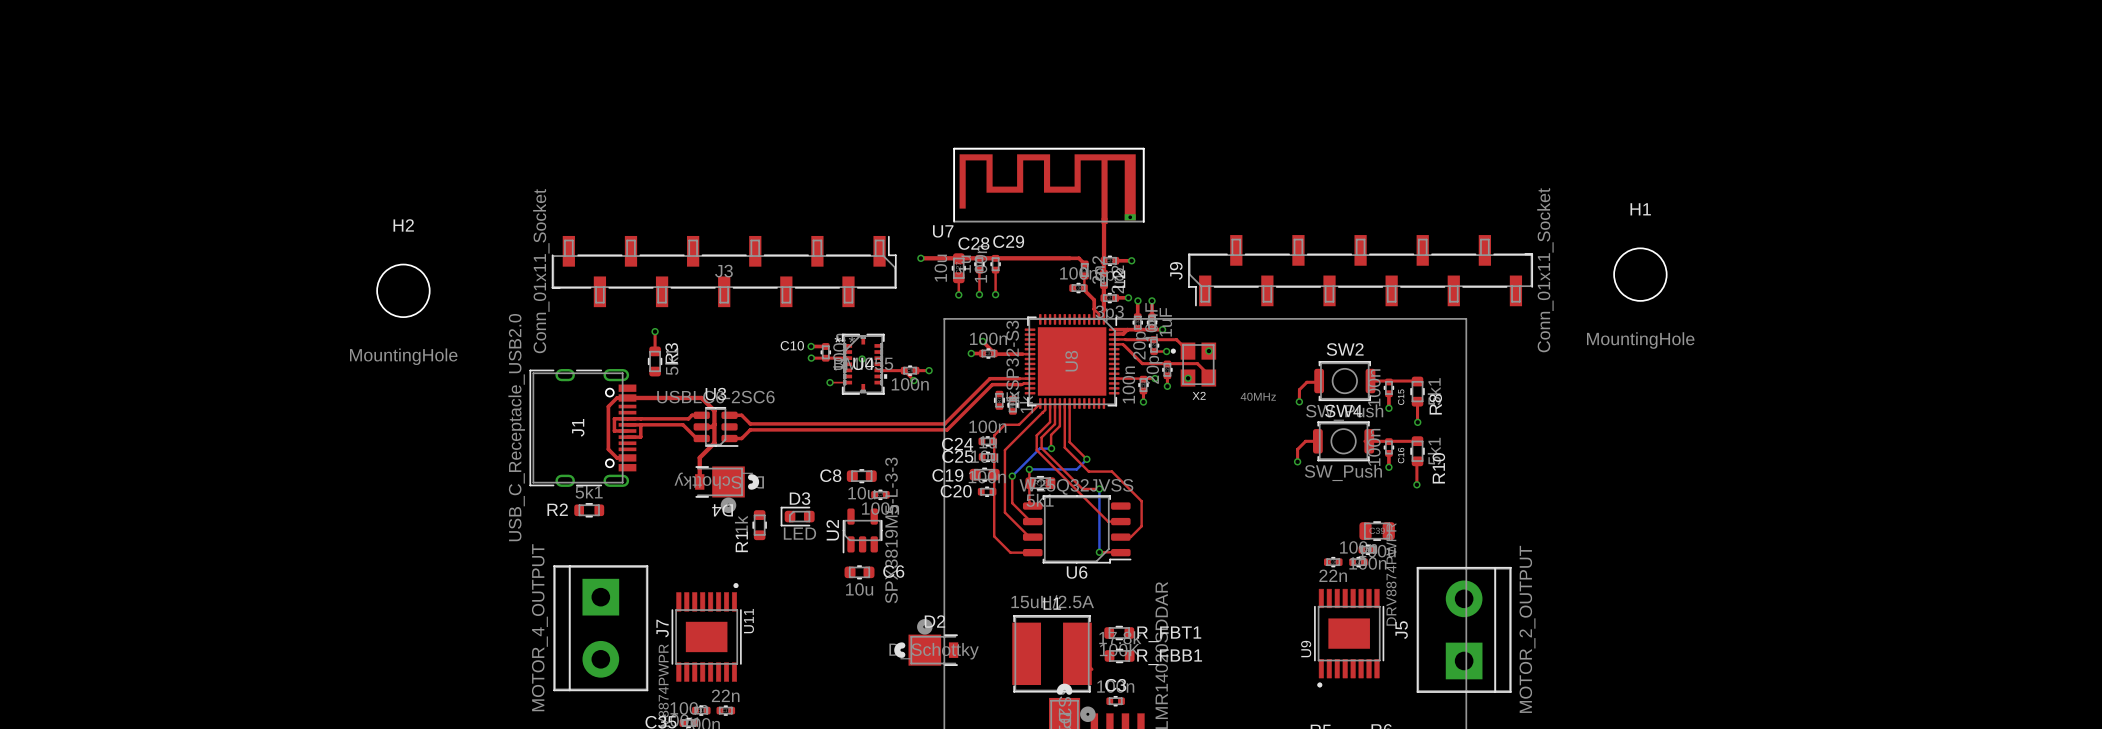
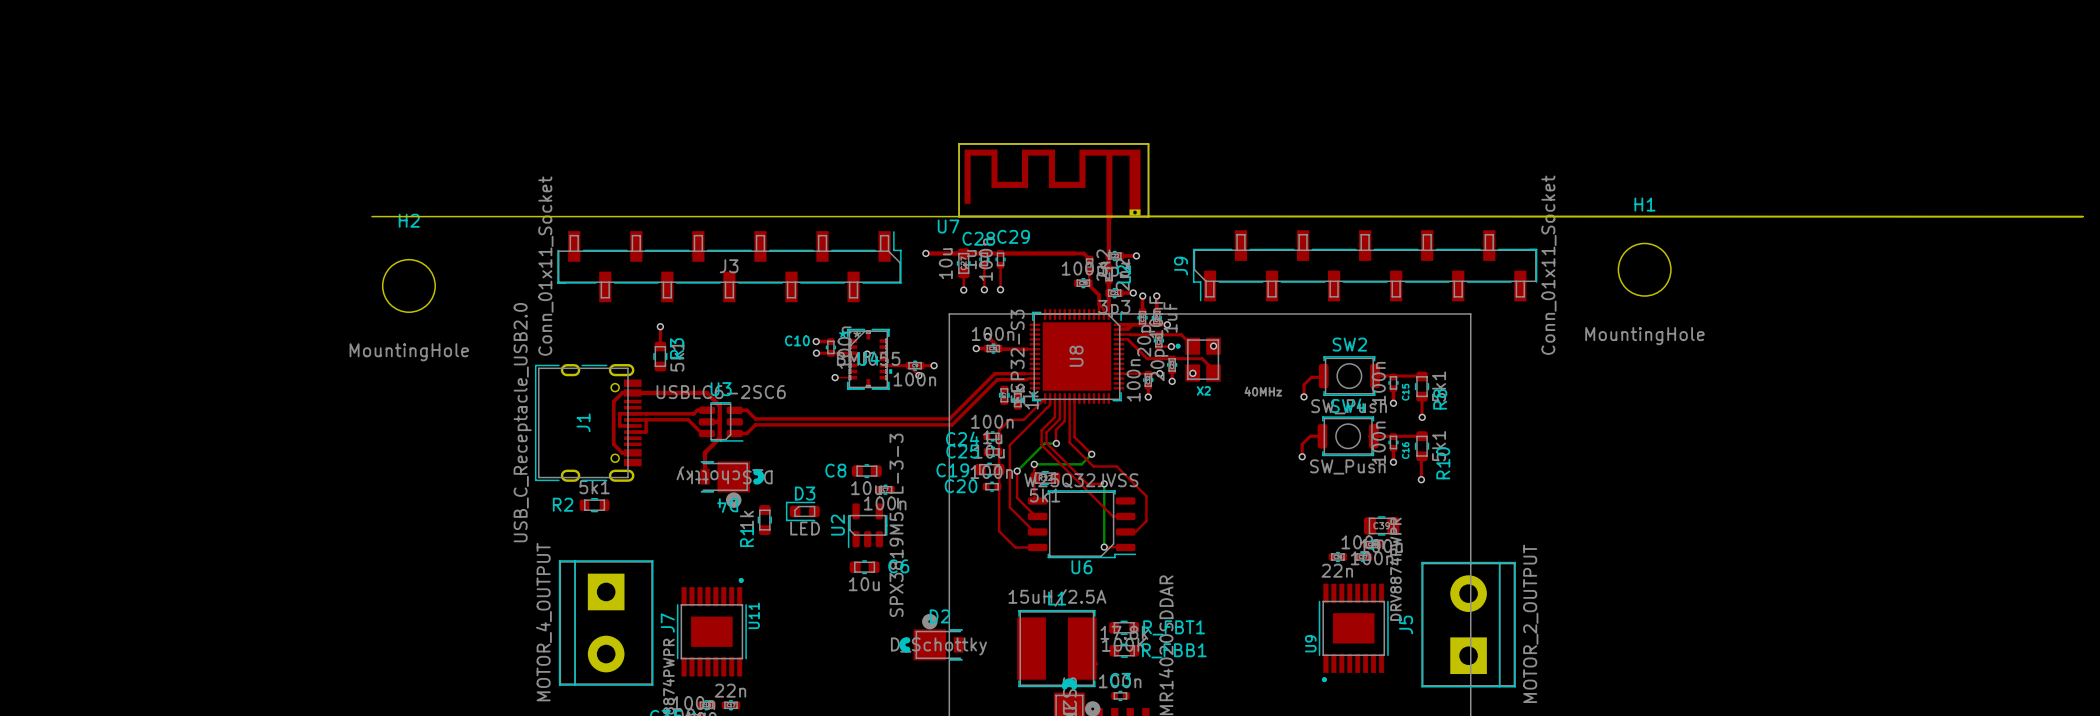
board edge: none -> (959, 216) (2083, 216) (371, 216)

